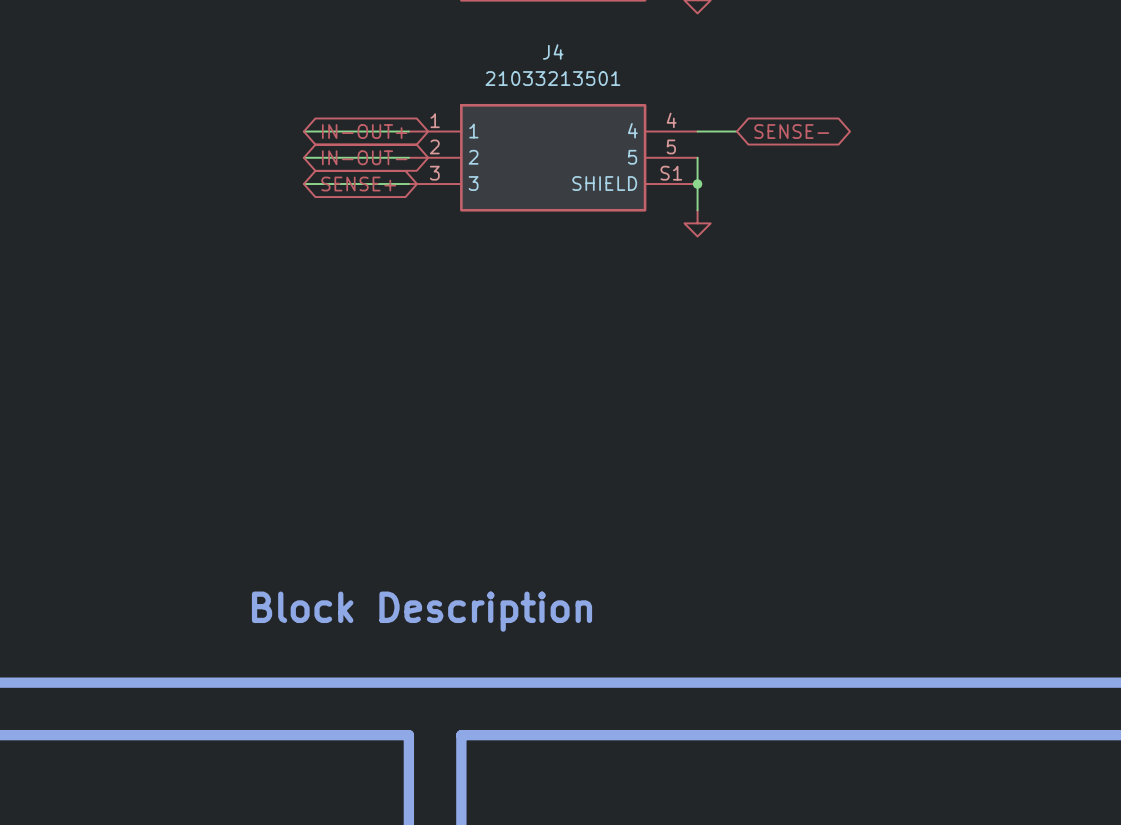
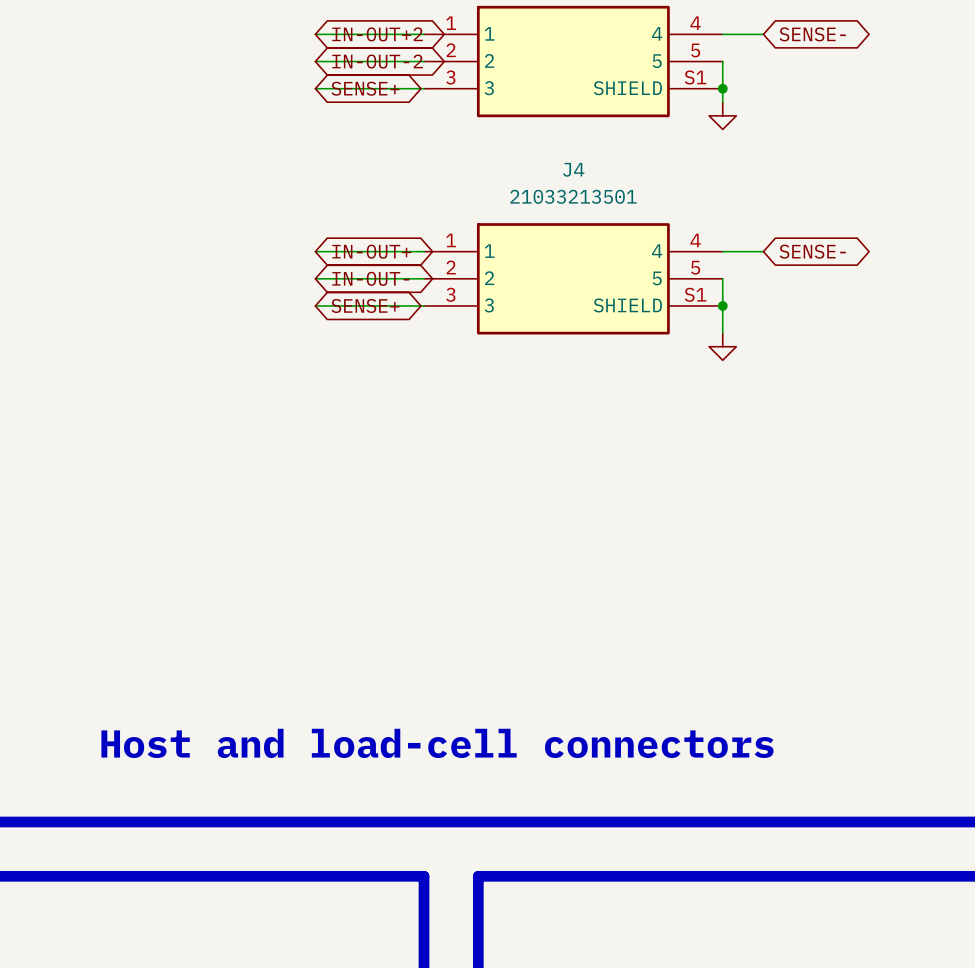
text: Block Description (422, 611) -> Host and load-cell connectors (437, 743)

